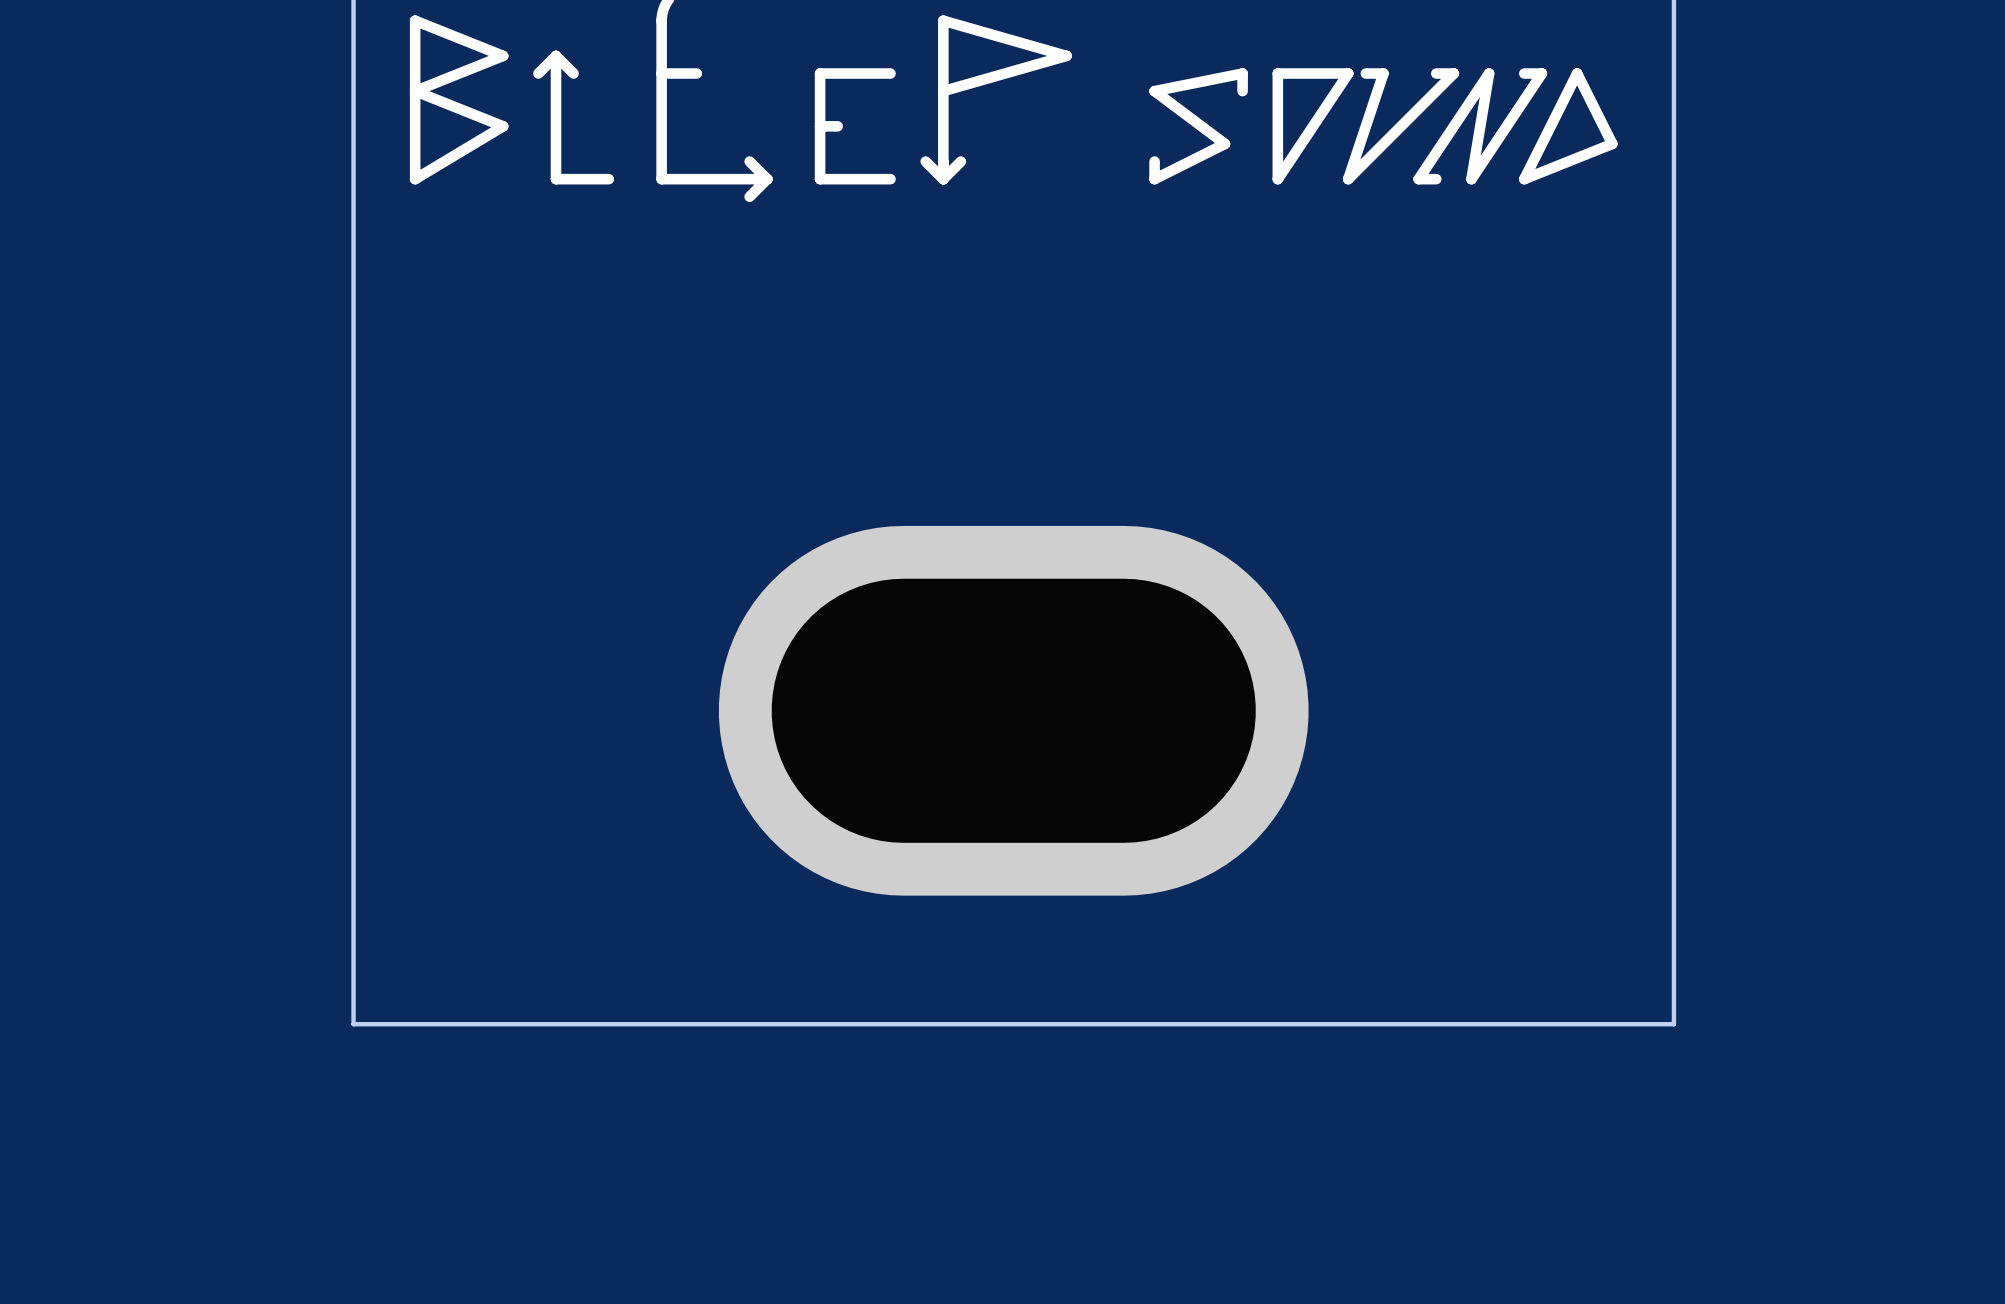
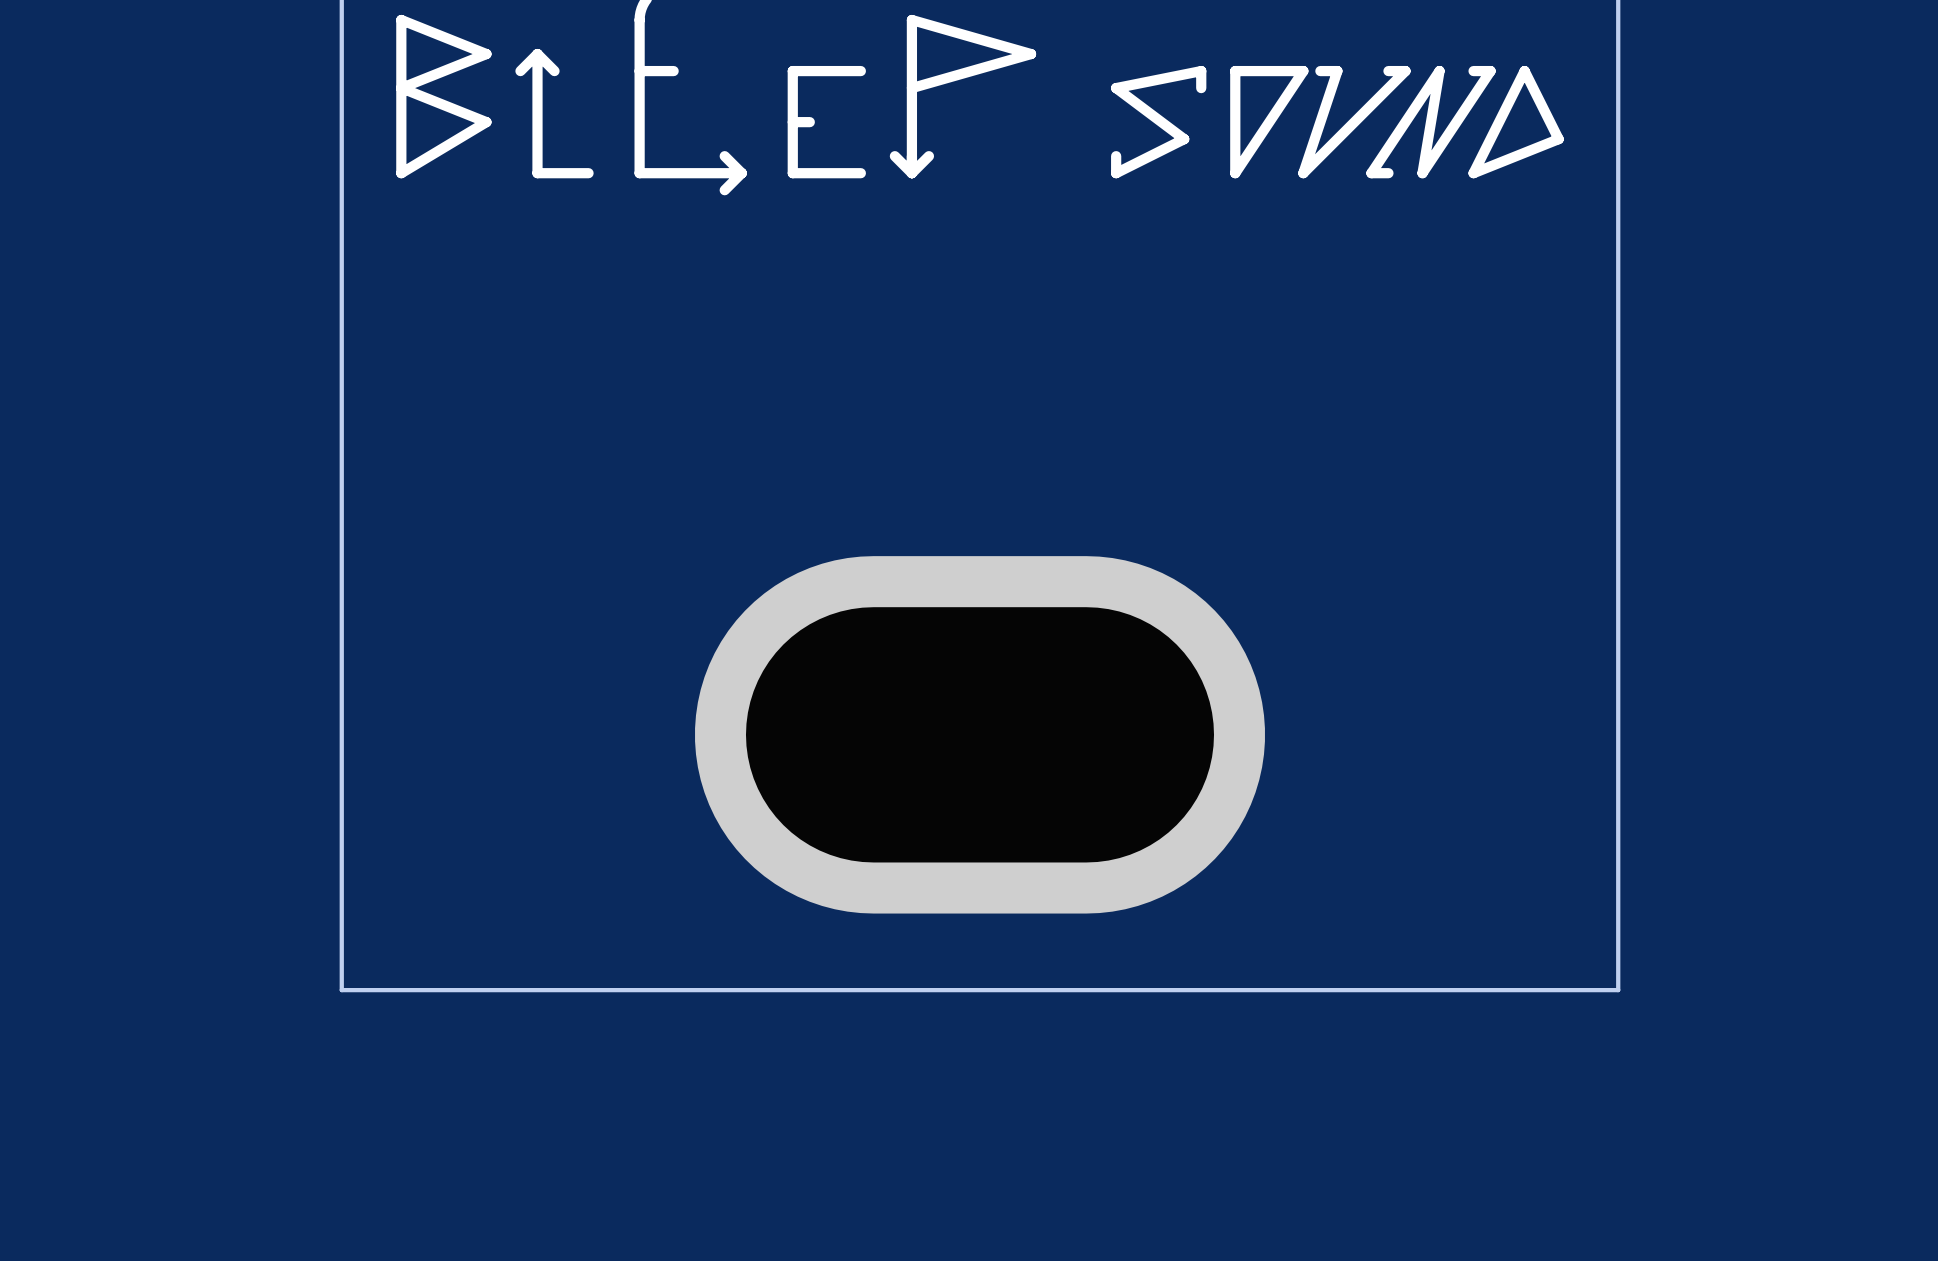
part position: (1013, 710) -> (979, 734)

